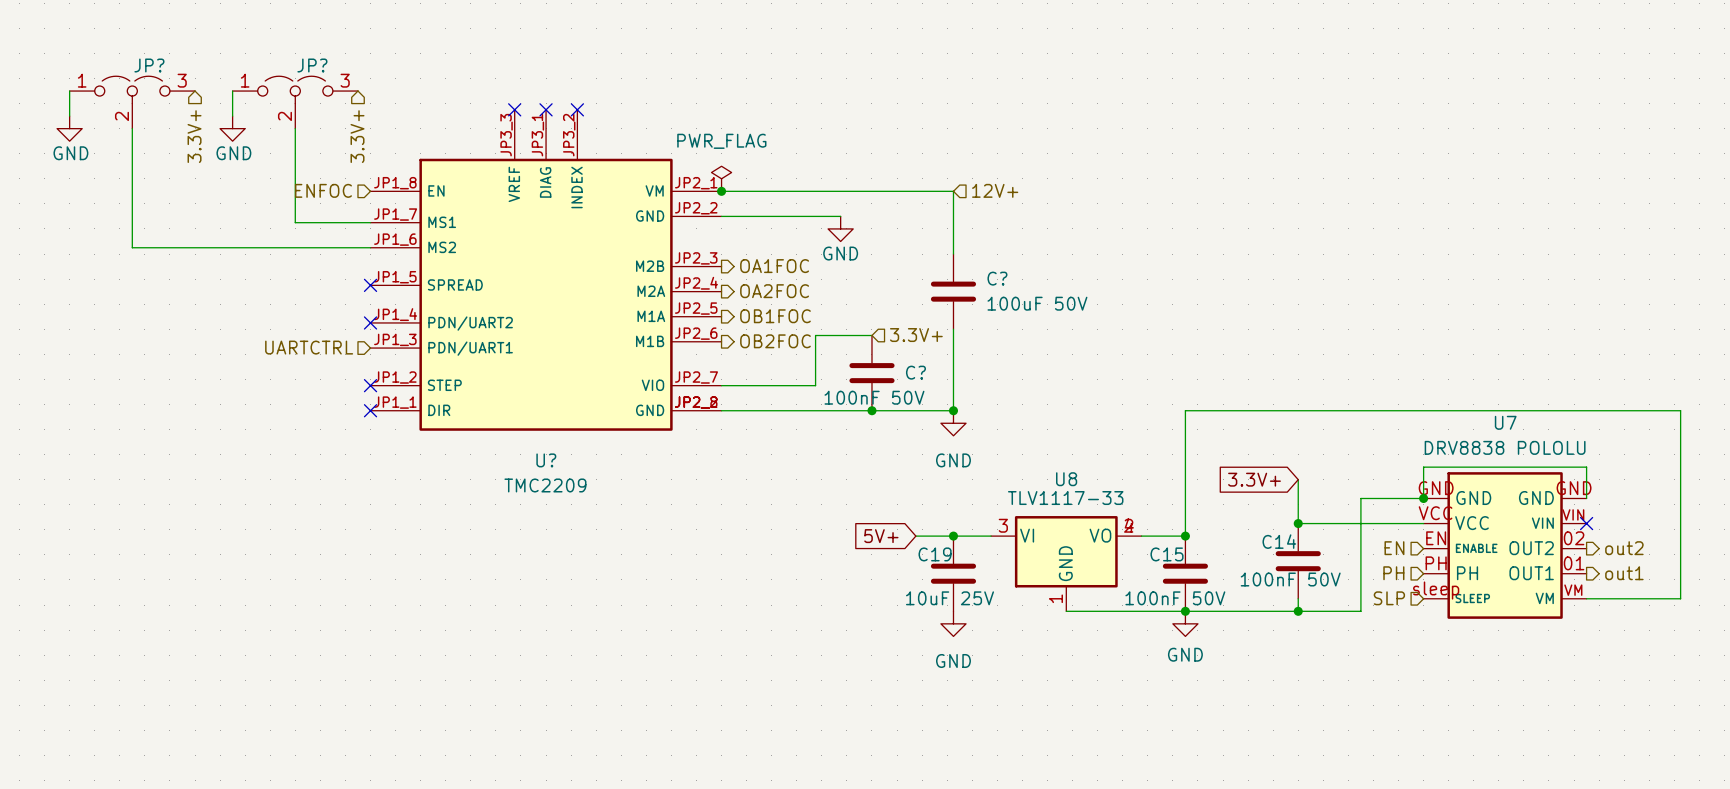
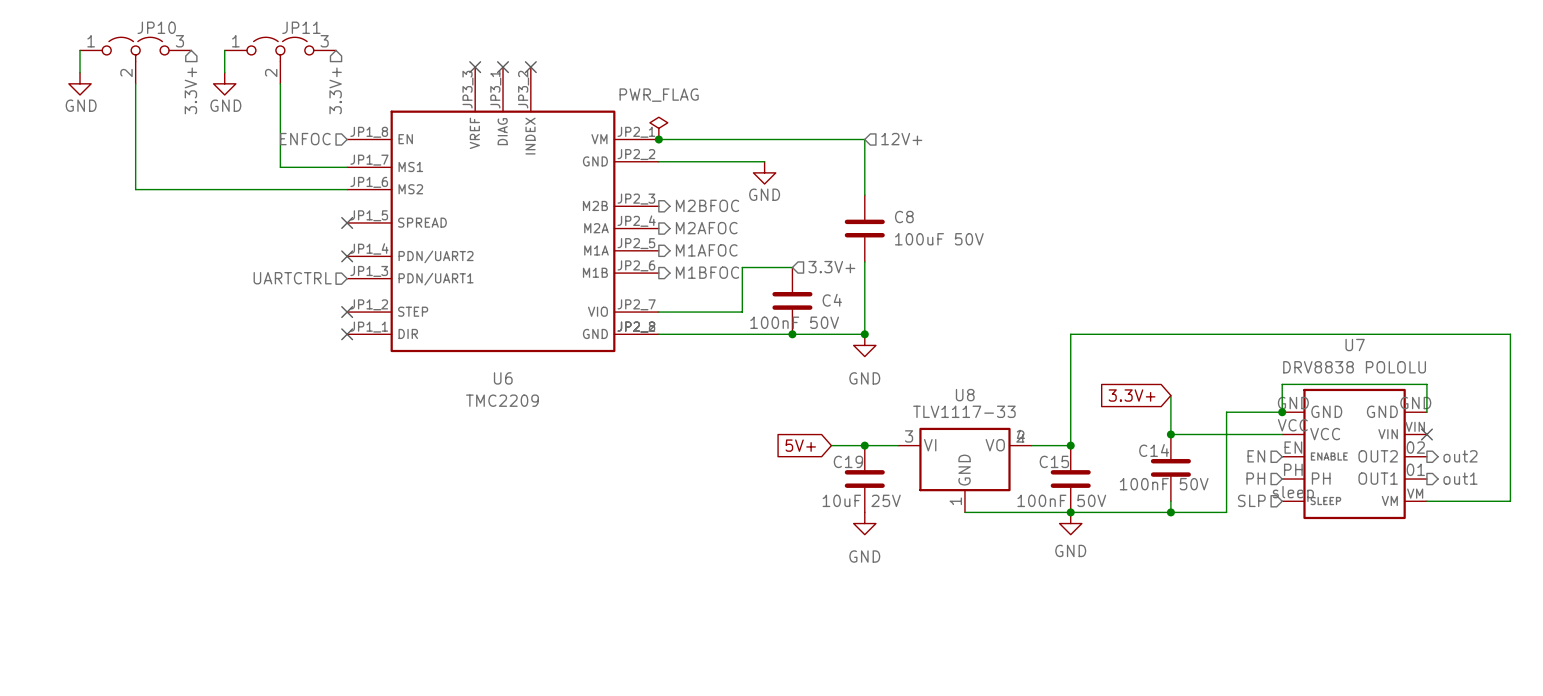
JP? name: JP? (149, 65) -> JP10 (156, 27)
JP? name: JP? (312, 65) -> JP11 (301, 27)
hierarchical label: OA1FOC (774, 266) -> M2BFOC (707, 205)
C? name: C? (997, 278) -> C8 (904, 217)
hierarchical label: OA2FOC (774, 291) -> M2AFOC (706, 228)
hierarchical label: OB1FOC (775, 316) -> M1AFOC (706, 250)
hierarchical label: OB2FOC (775, 341) -> M1BFOC (707, 272)
C? name: C? (915, 372) -> C4 (832, 300)
U? name: U? (546, 460) -> U6 (503, 378)

